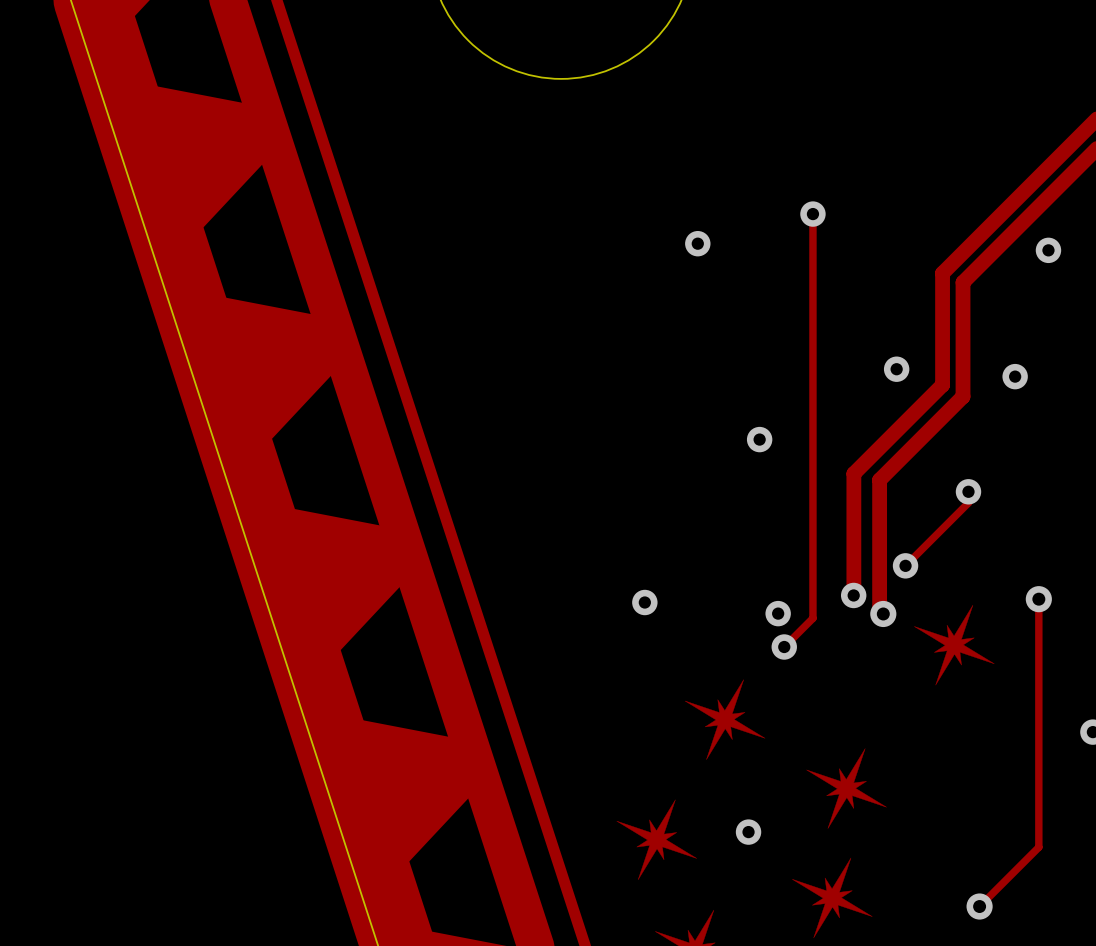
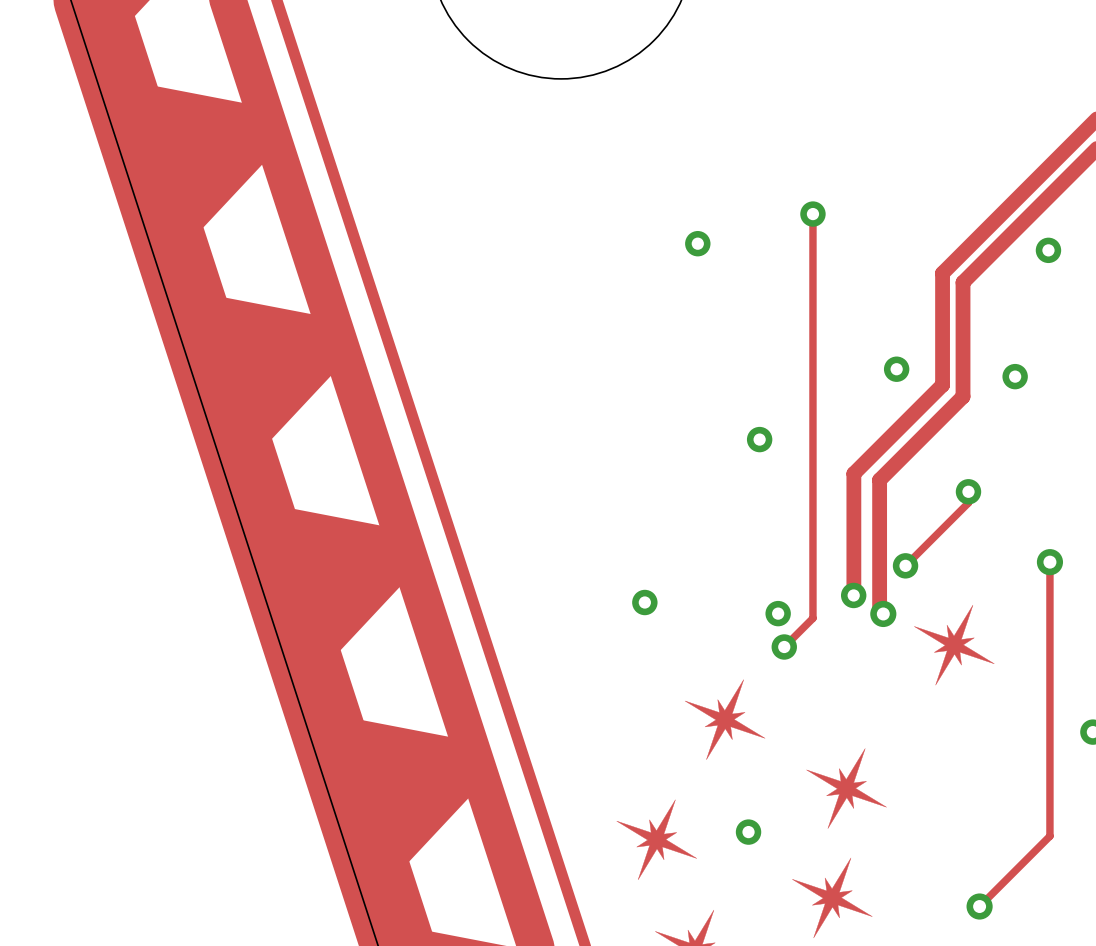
track: (1038, 599) (1038, 847) -> (1049, 562) (1049, 836) (1038, 847)
via position: (1038, 599) -> (1049, 562)

